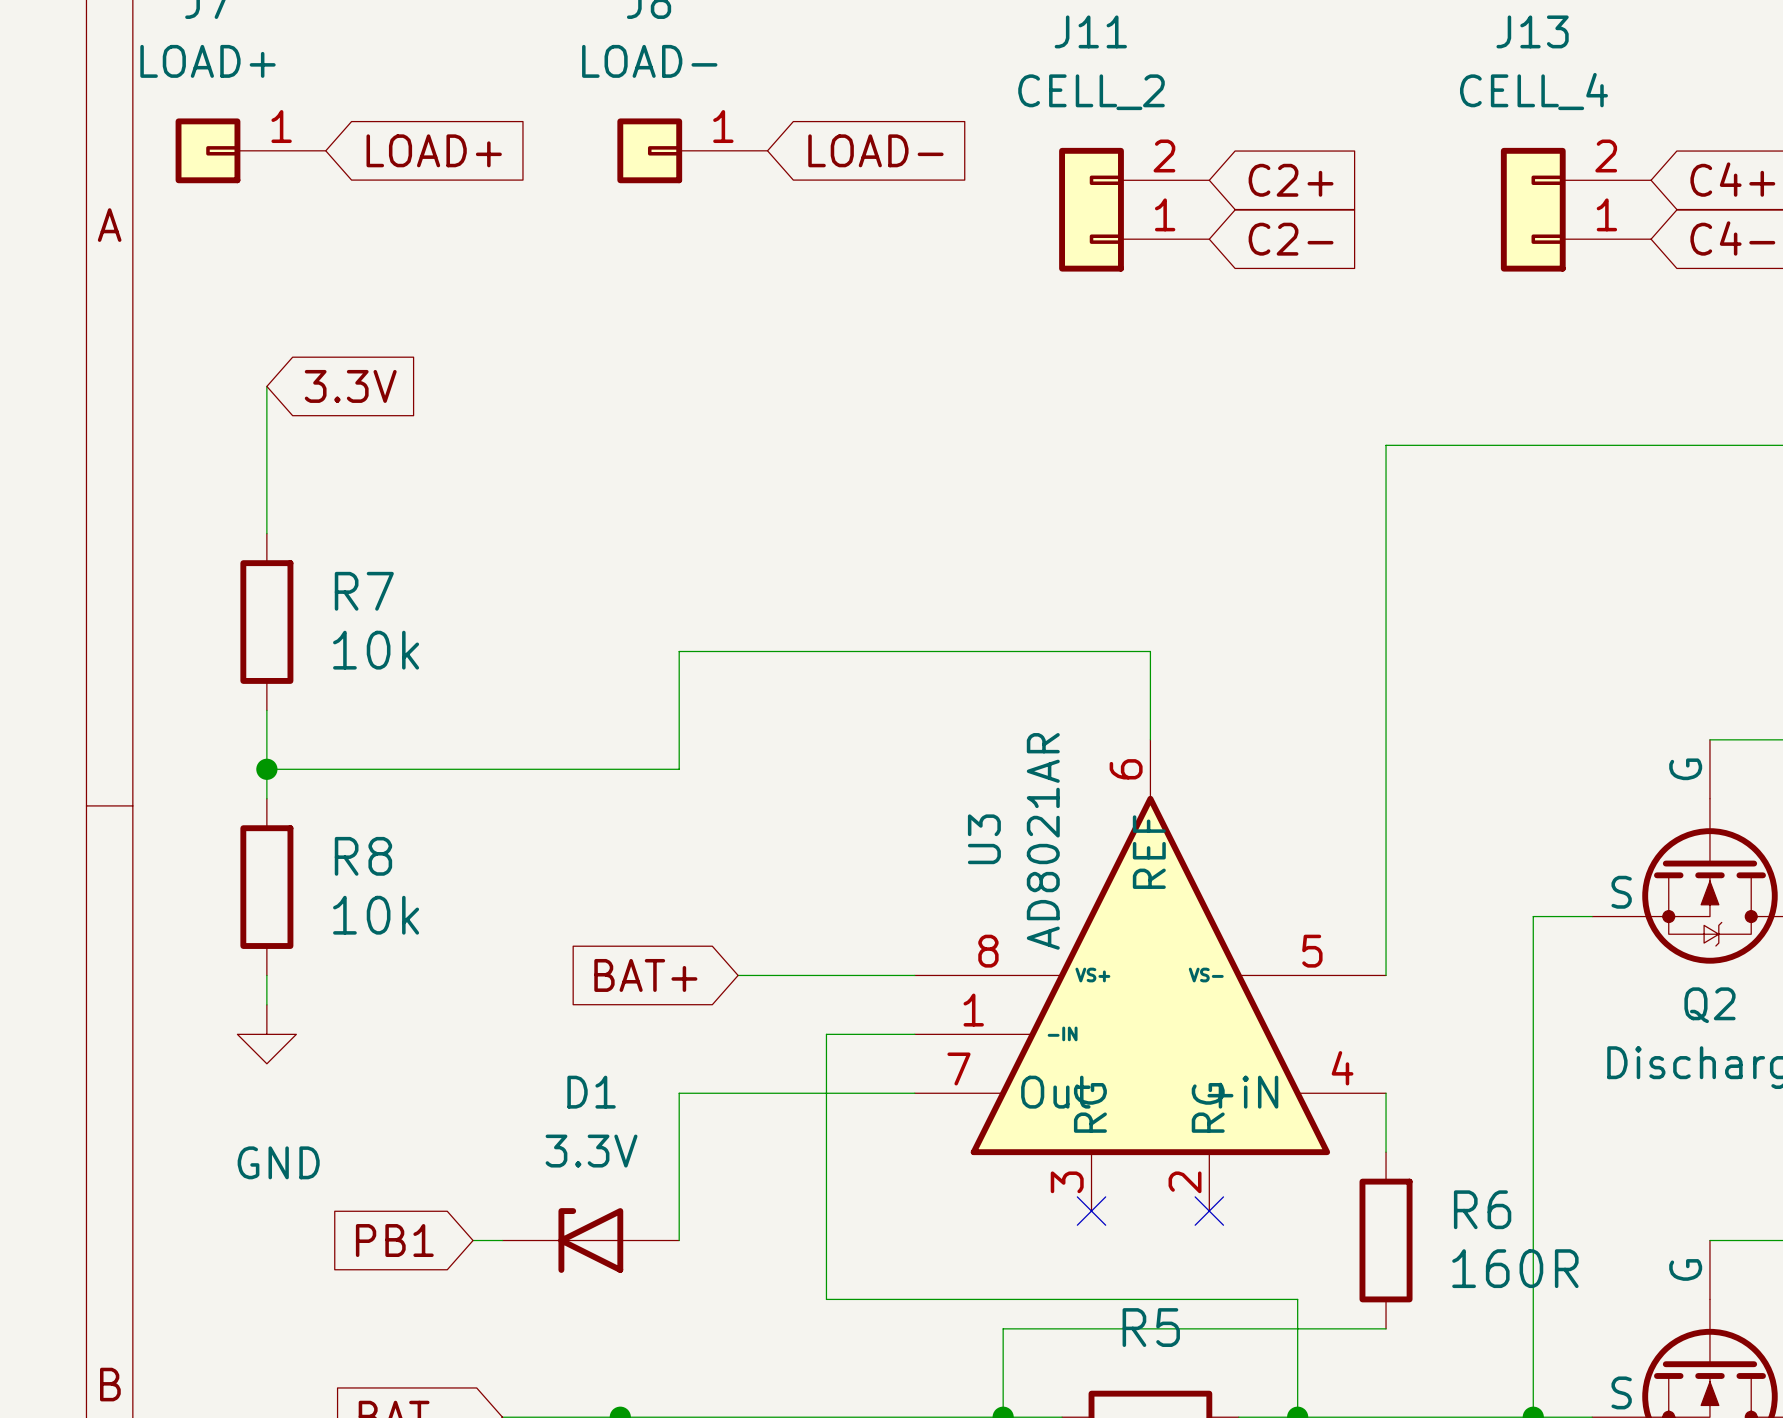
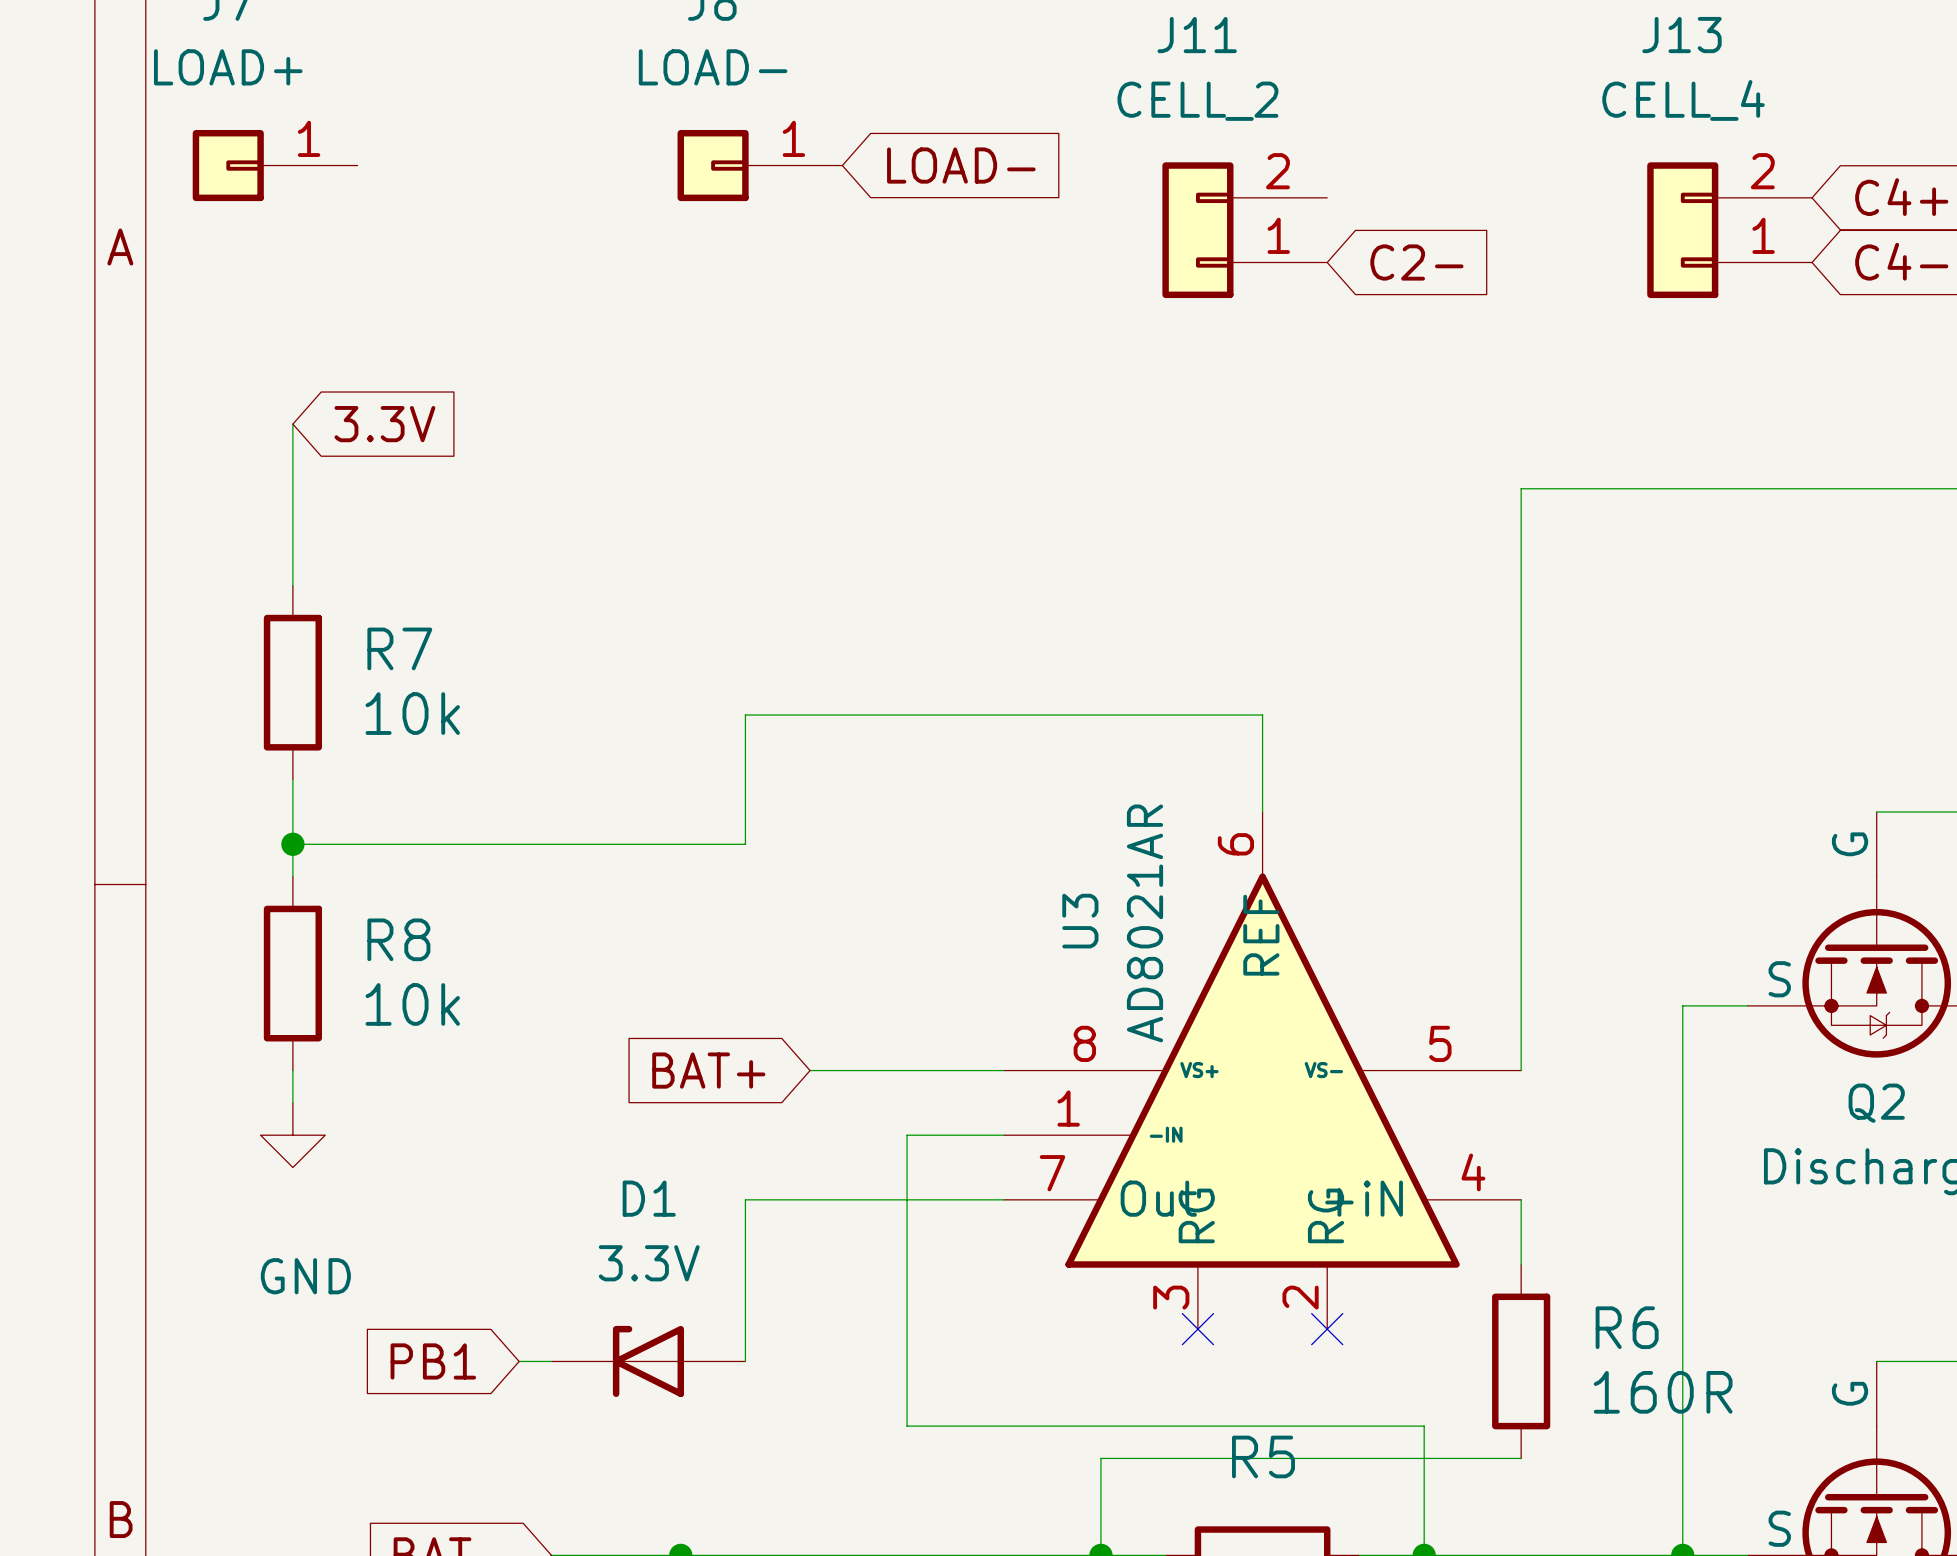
global label: LOAD+ (434, 150) -> none
global label: C2+ (1291, 180) -> none

